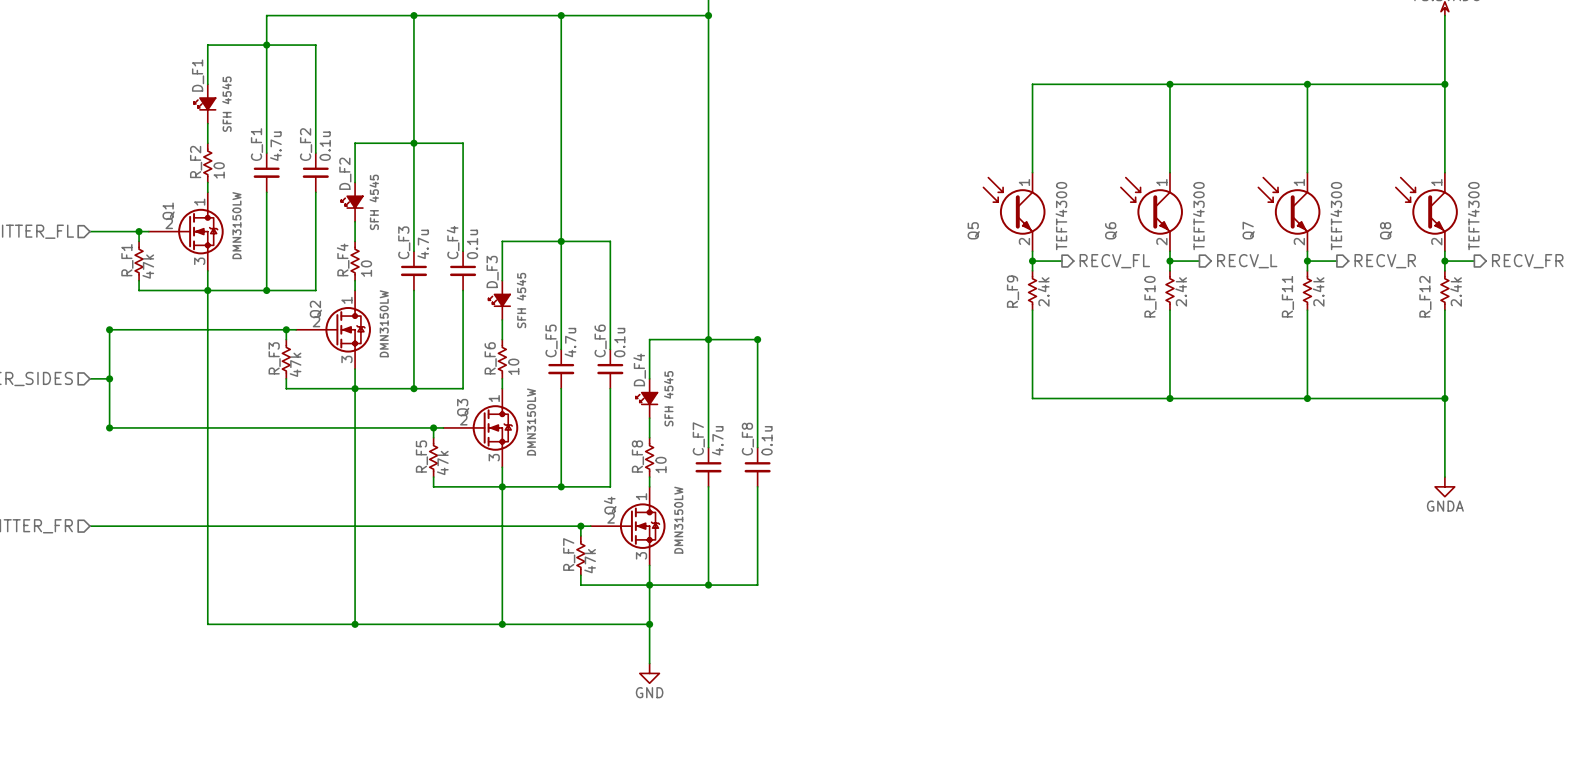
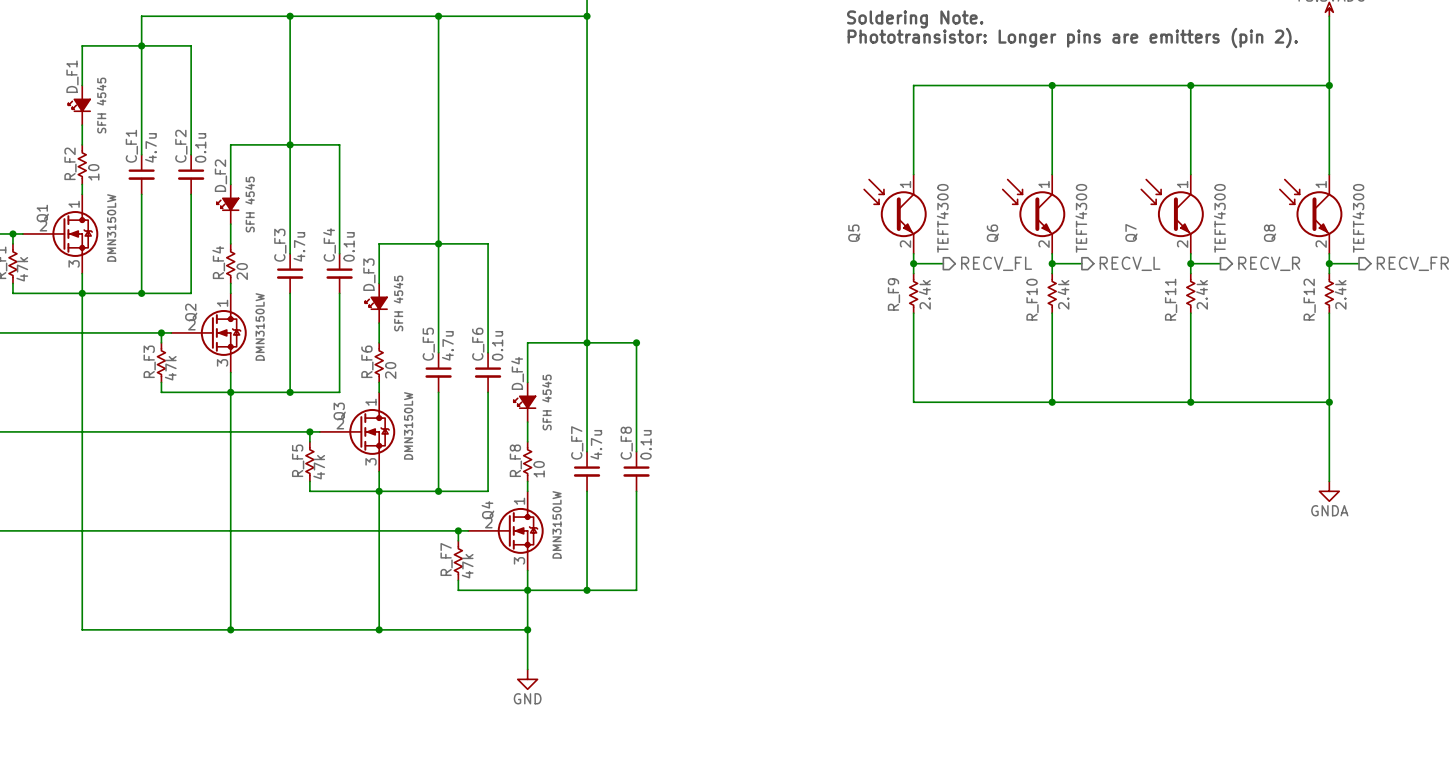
text: none -> Soldering Note. (915, 19)
text: none -> Phototransistor: Longer pins are emitters (pin 2). (1072, 38)
R_F4 value: 10 (366, 268) -> 20 (242, 271)
R_F6 value: 10 (513, 366) -> 20 (390, 370)

